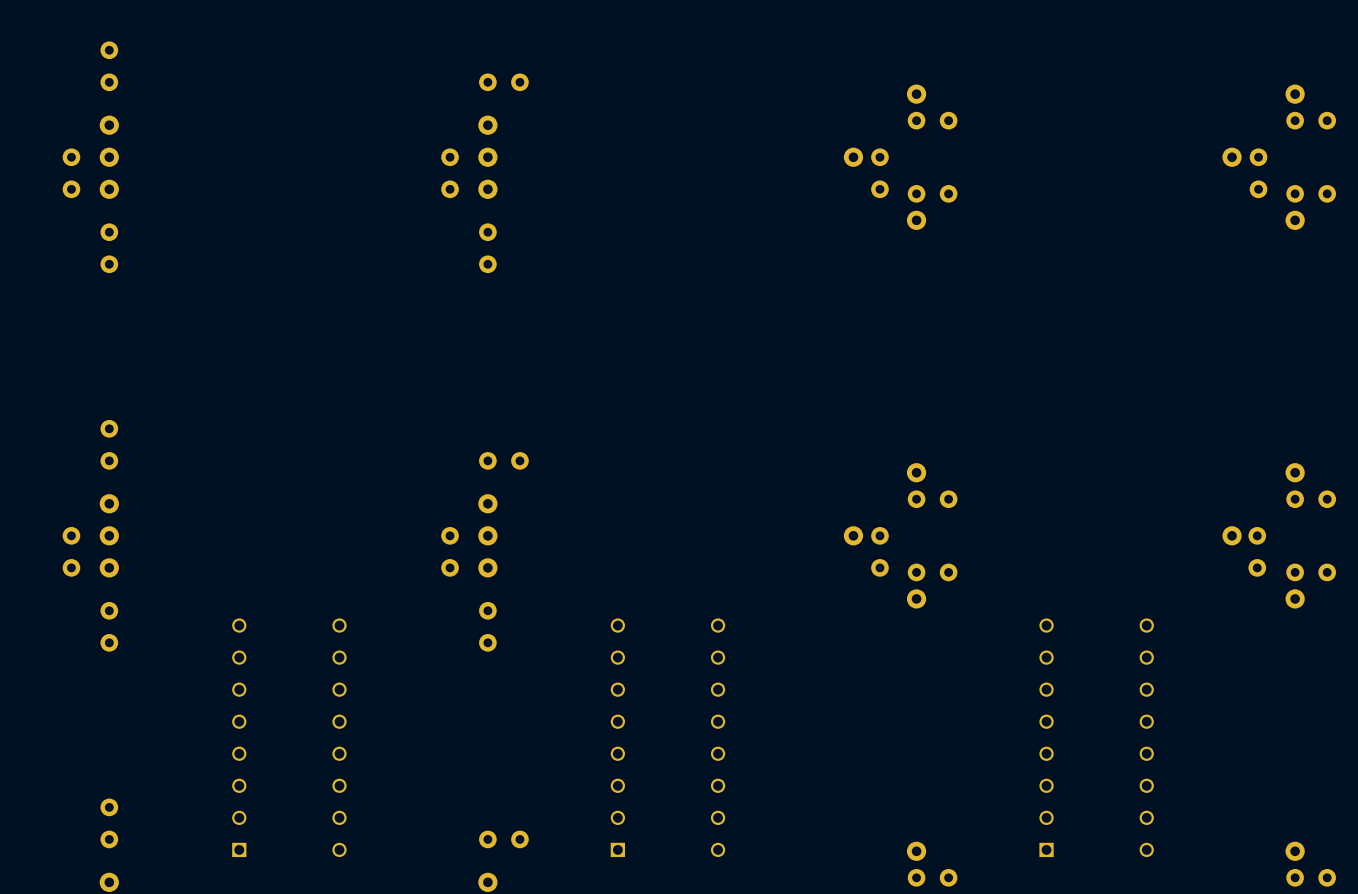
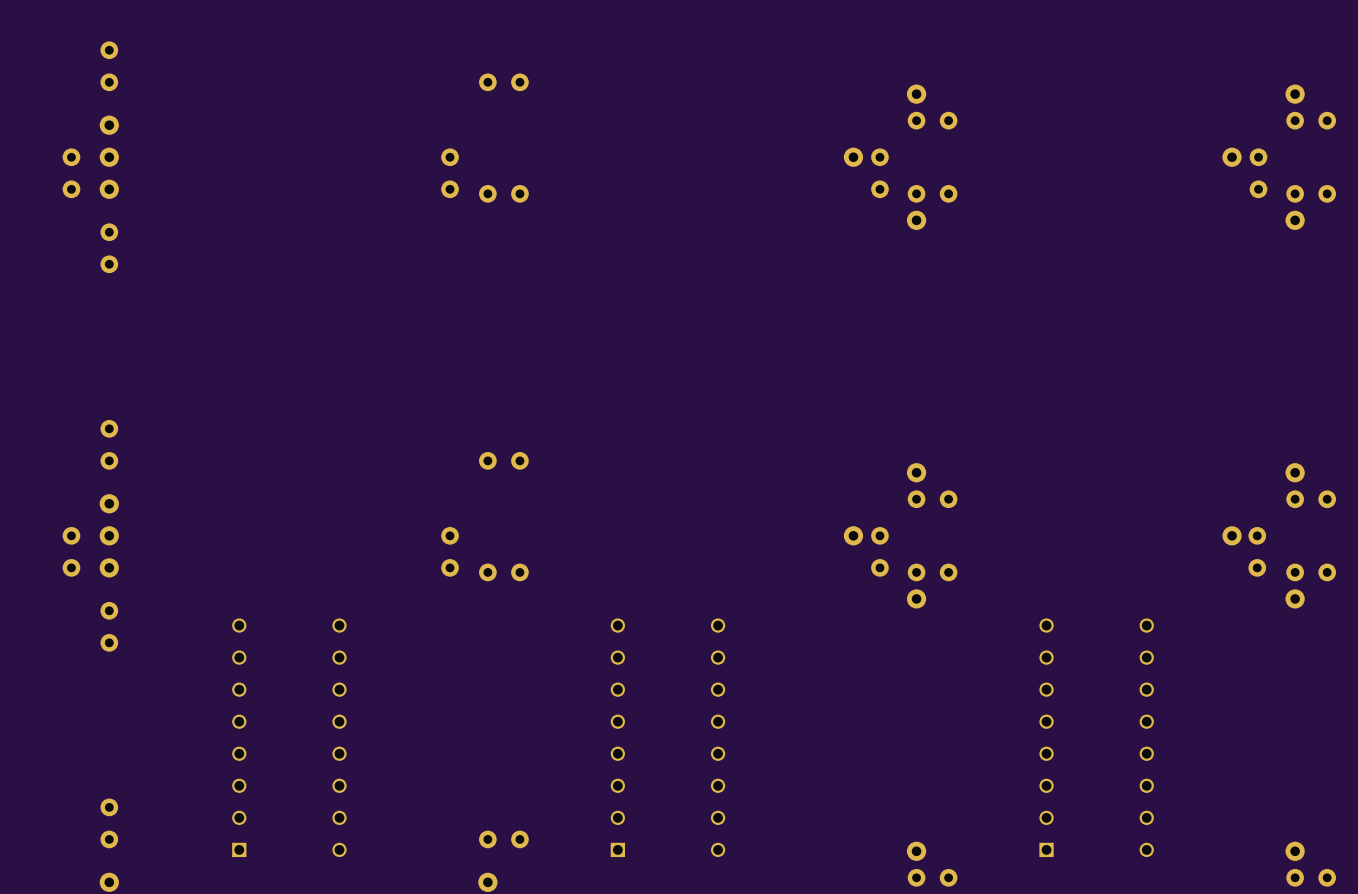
part: (487, 157) -> none
part rotation: 0° (487, 248) -> 90° clockwise (503, 193)
part position: (487, 248) -> (503, 193)
part: (487, 535) -> none
part rotation: 0° (487, 626) -> 90° clockwise (503, 572)
part position: (487, 626) -> (503, 572)

